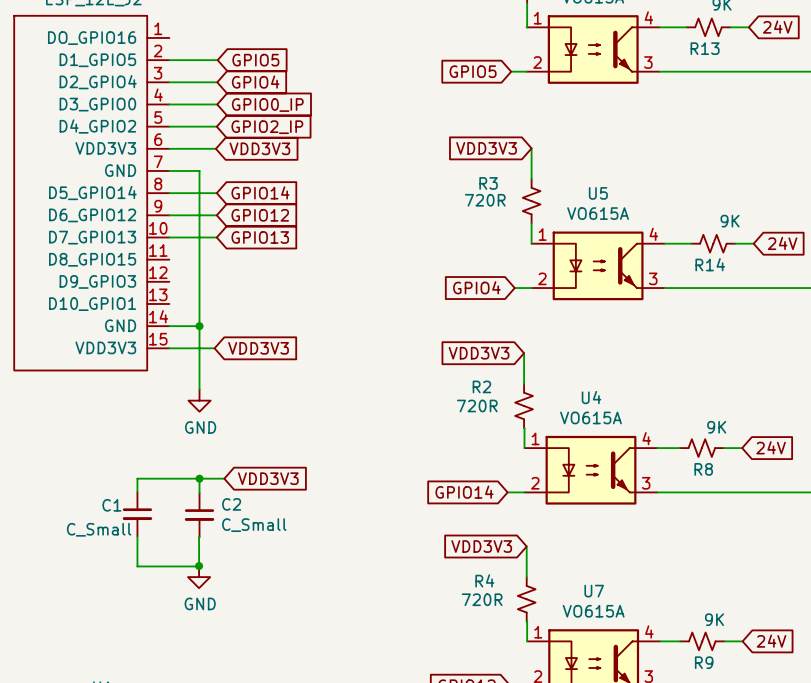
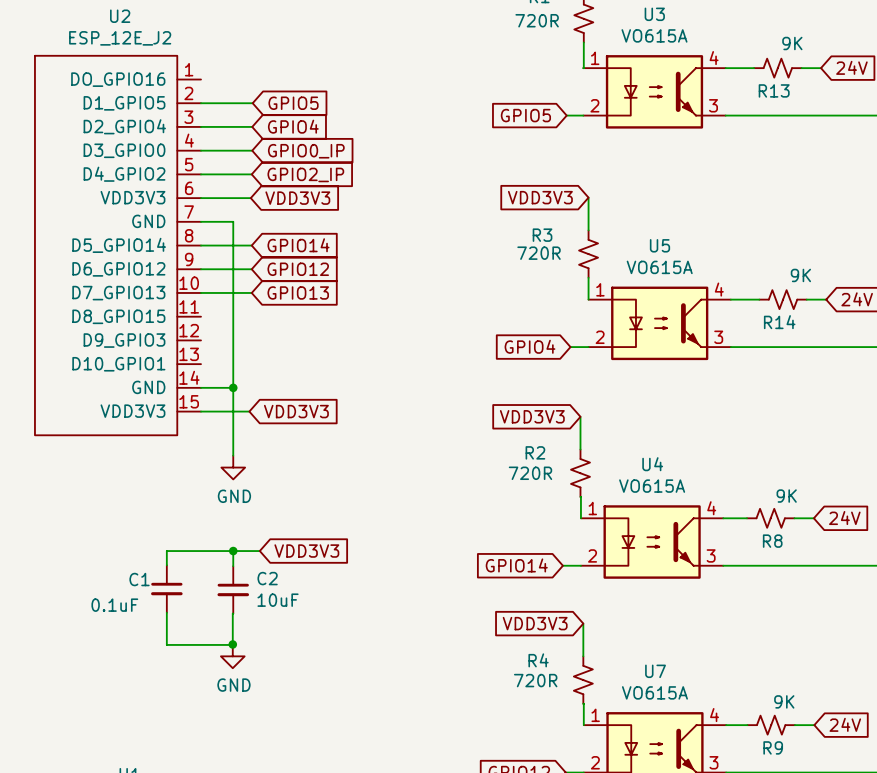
C2 value: C_Small (254, 525) -> 10uF (278, 600)
C1 value: C_Small (99, 529) -> 0.1uF (114, 605)

